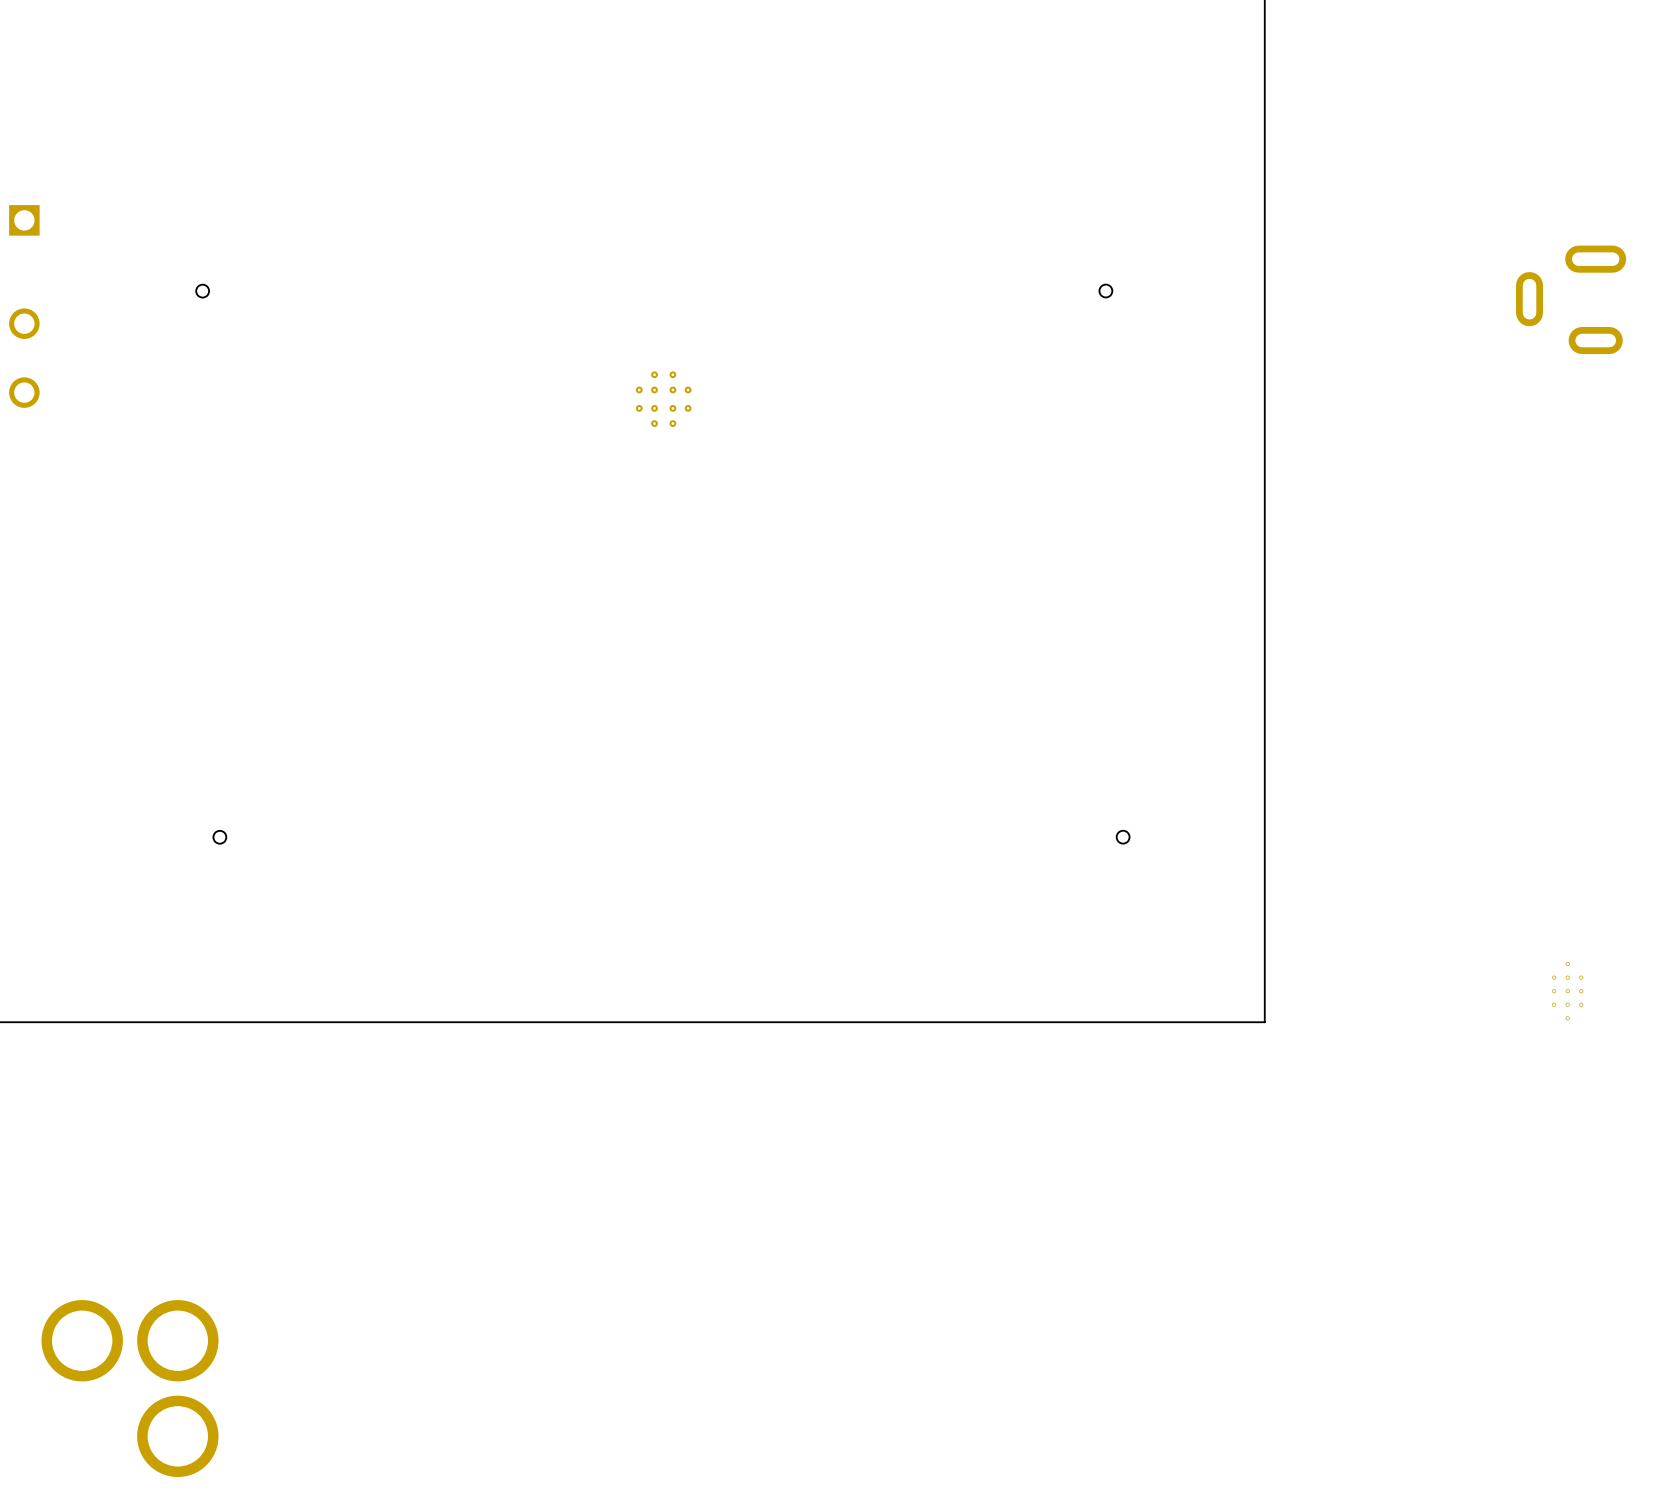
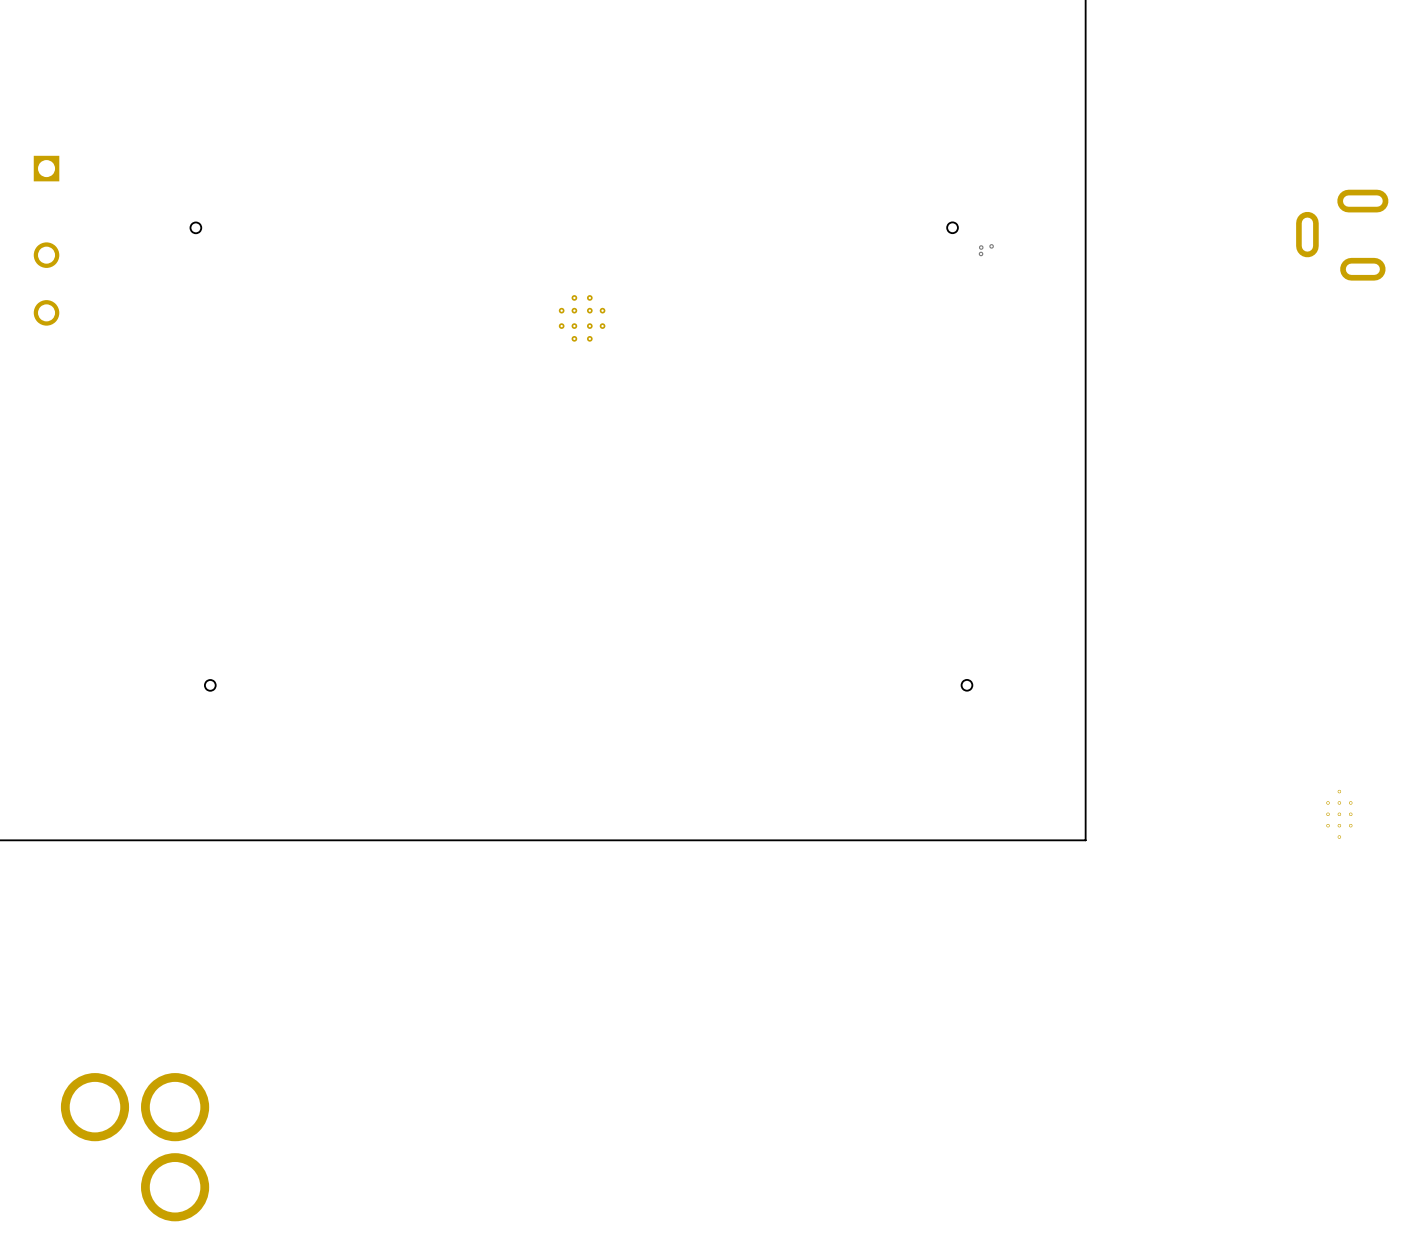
via: none -> (991, 246)
via: none -> (981, 247)
via: none -> (981, 253)

